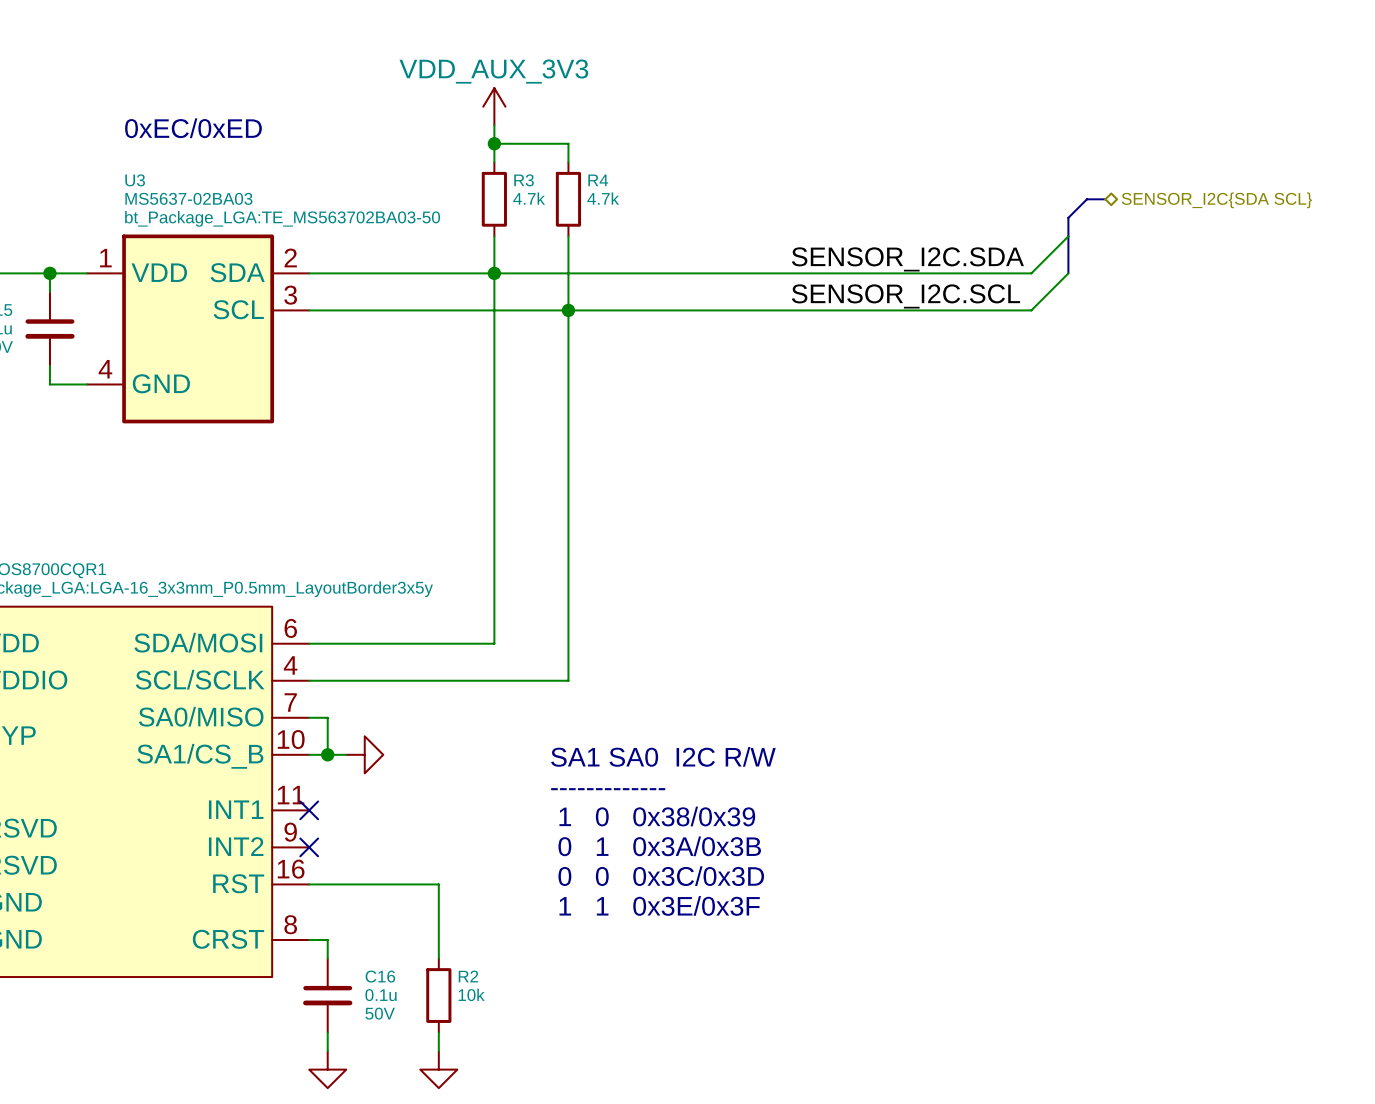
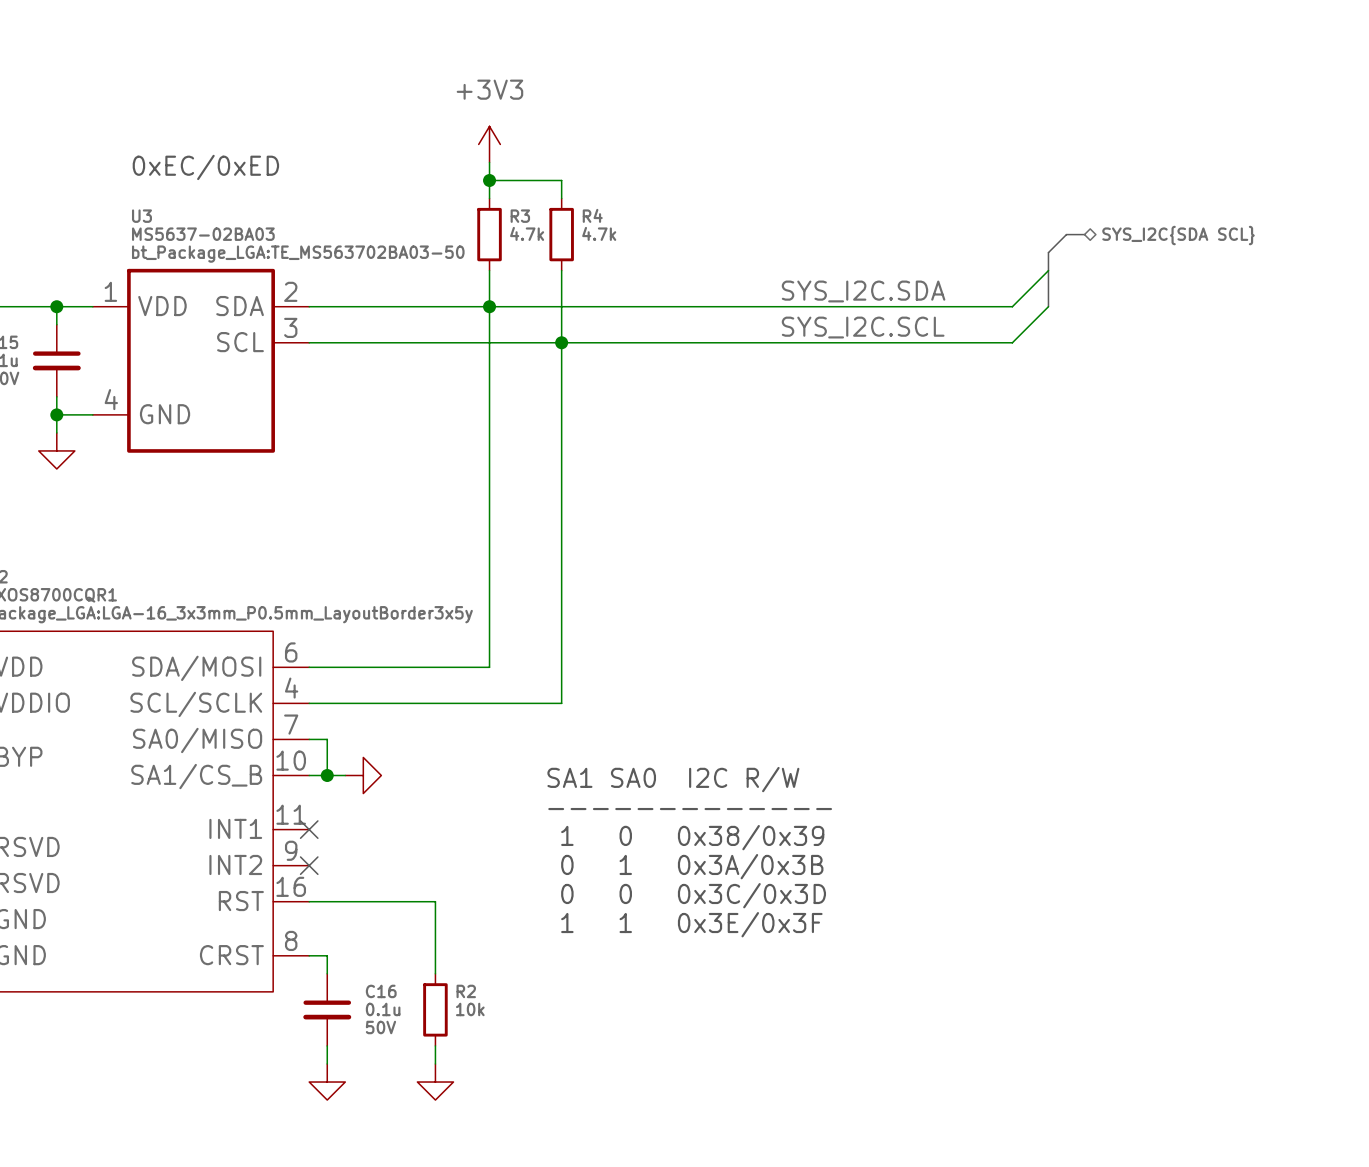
power symbol: VDD_AUX_3V3 (494, 106) -> +3V3 (489, 144)
hierarchical label: SENSOR_I2C{SDA SCL} (1216, 200) -> SYS_I2C{SDA SCL} (1178, 235)
label: SENSOR_I2C.SDA (907, 259) -> SYS_I2C.SDA (863, 291)
label: SENSOR_I2C.SCL (905, 296) -> SYS_I2C.SCL (863, 327)
wire: none -> (56, 414) (56, 432)
junction: none -> (56, 414)
power symbol: none -> (56, 450)

